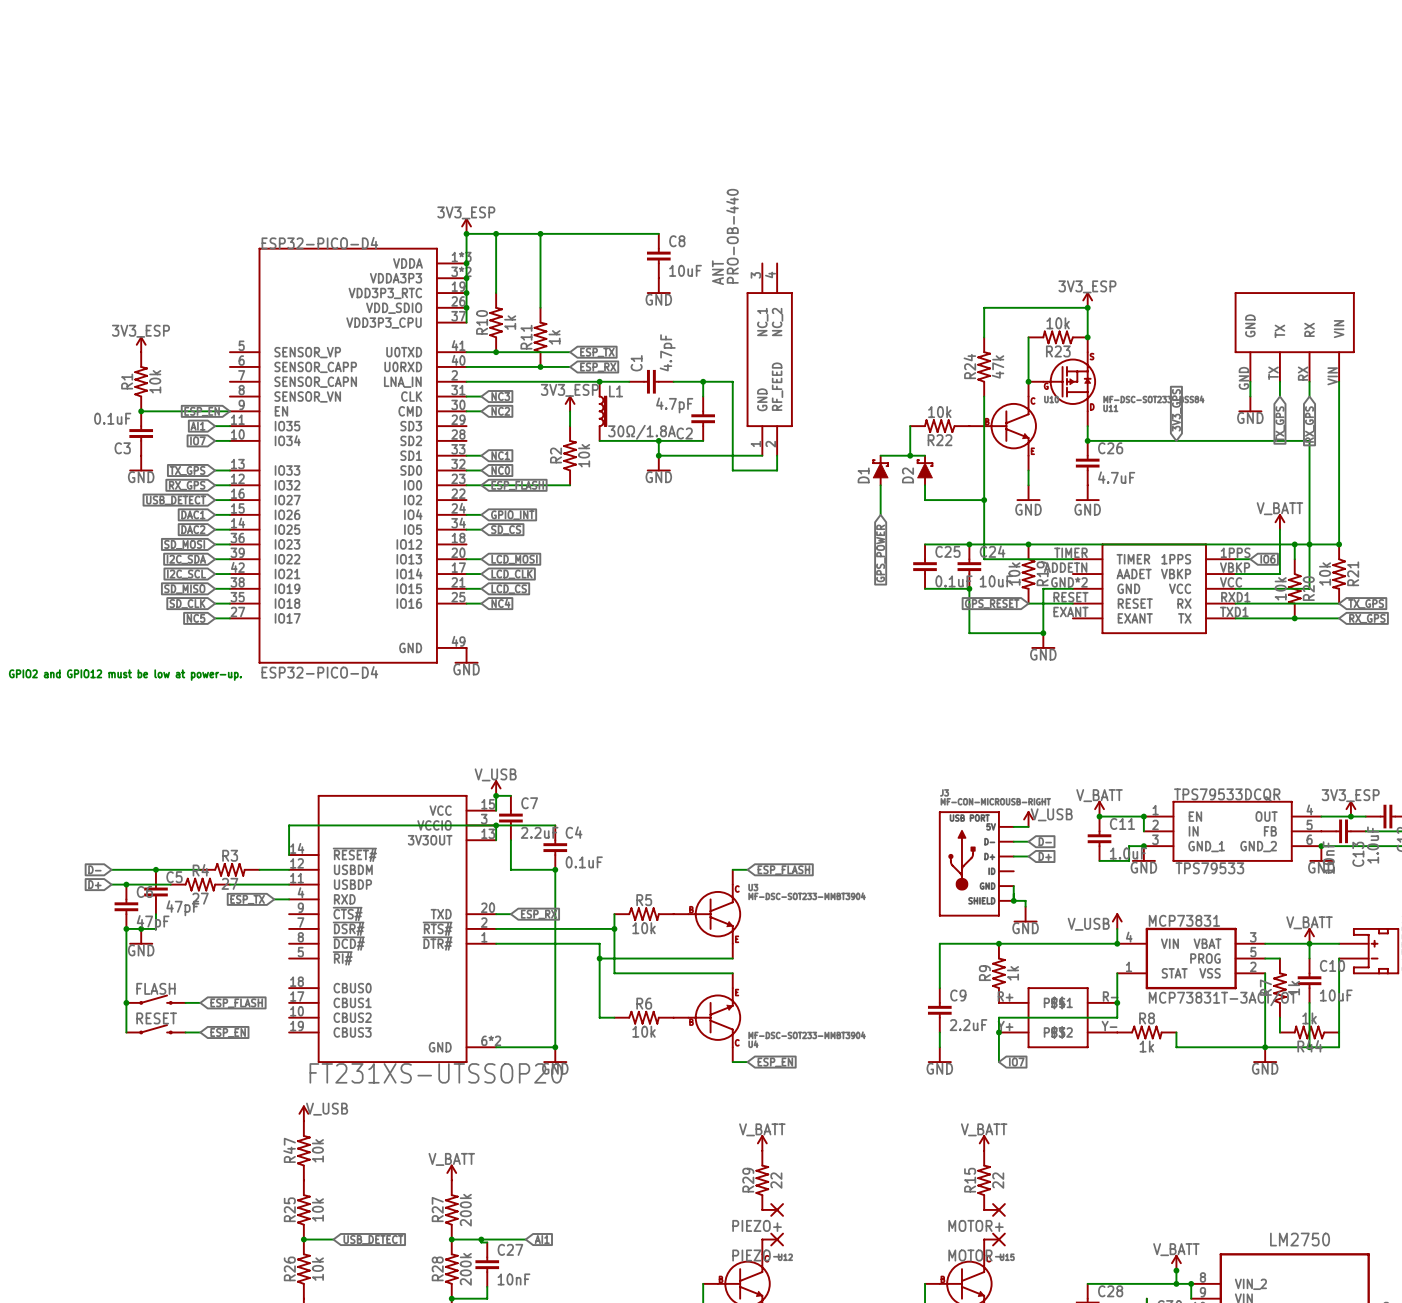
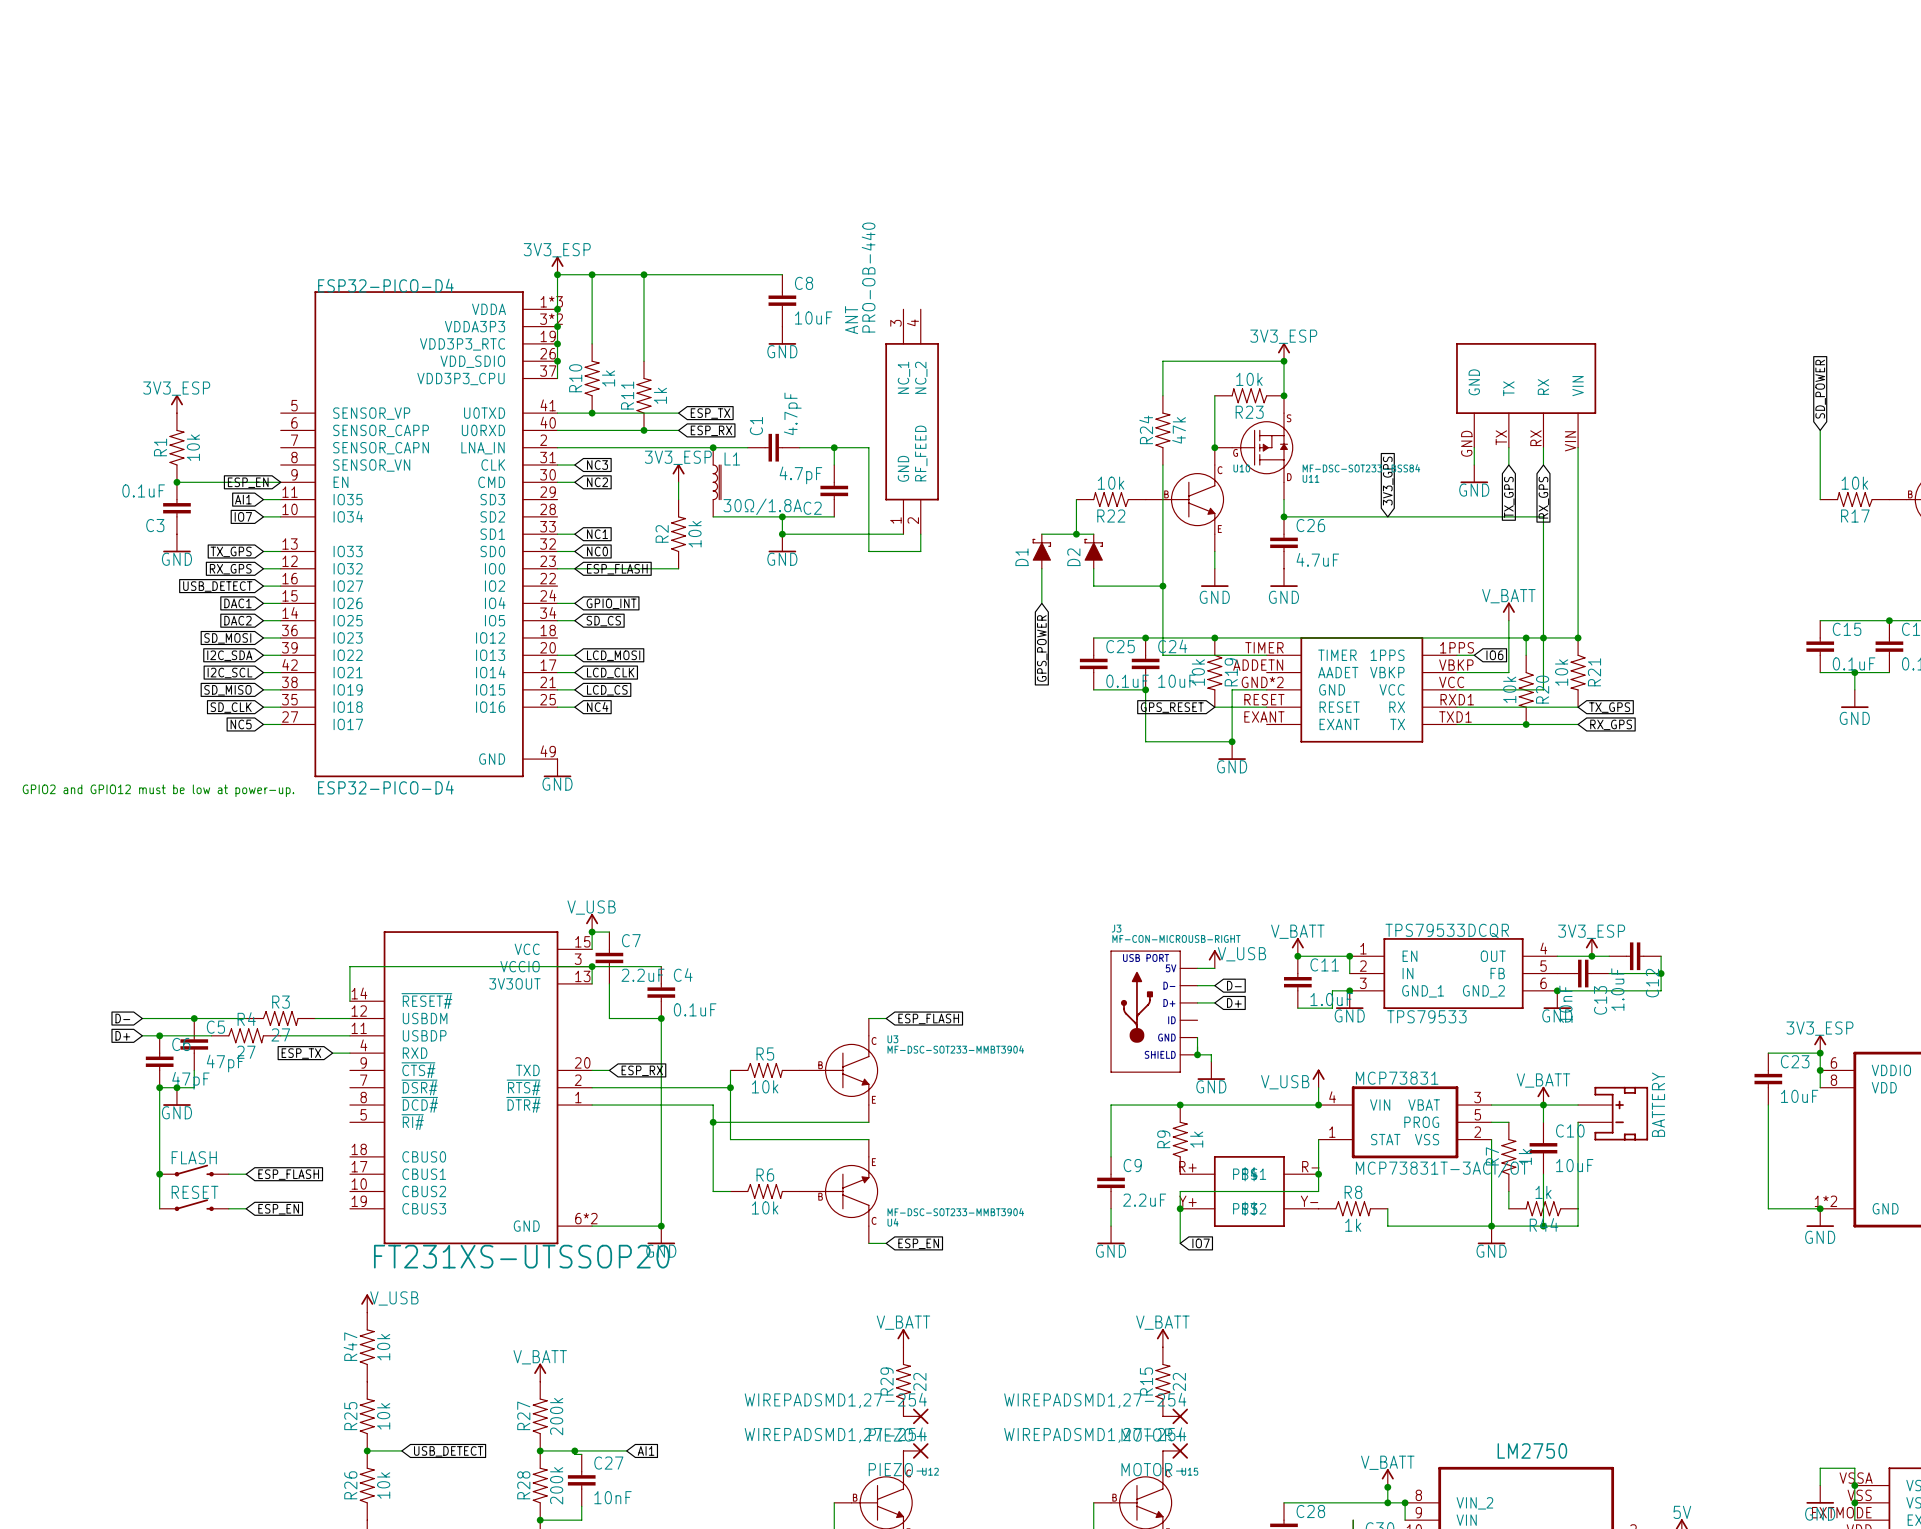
PIEZO+ value: none -> WIREPADSMD1,27-254 (835, 1400)
MOTOR+ value: none -> WIREPADSMD1,27-254 (1095, 1400)
PIEZO- value: none -> WIREPADSMD1,27-254 (835, 1435)
MOTOR- value: none -> WIREPADSMD1,27-254 (1095, 1435)

